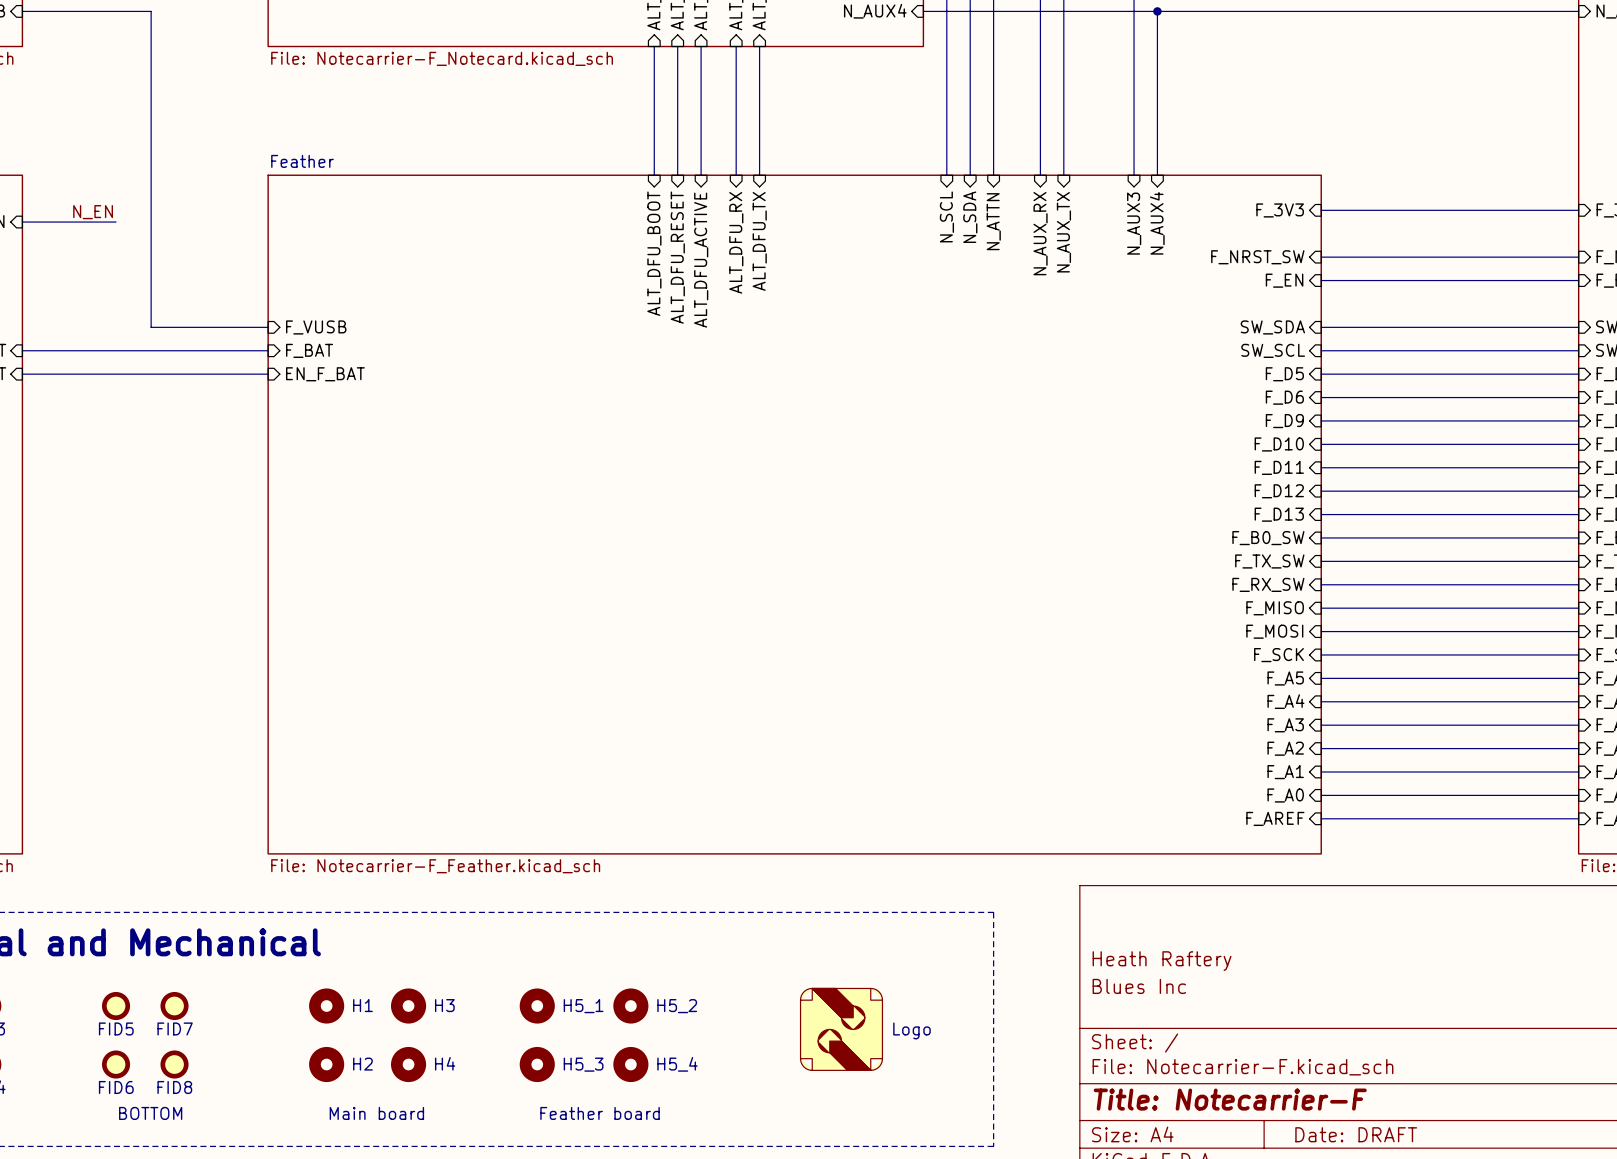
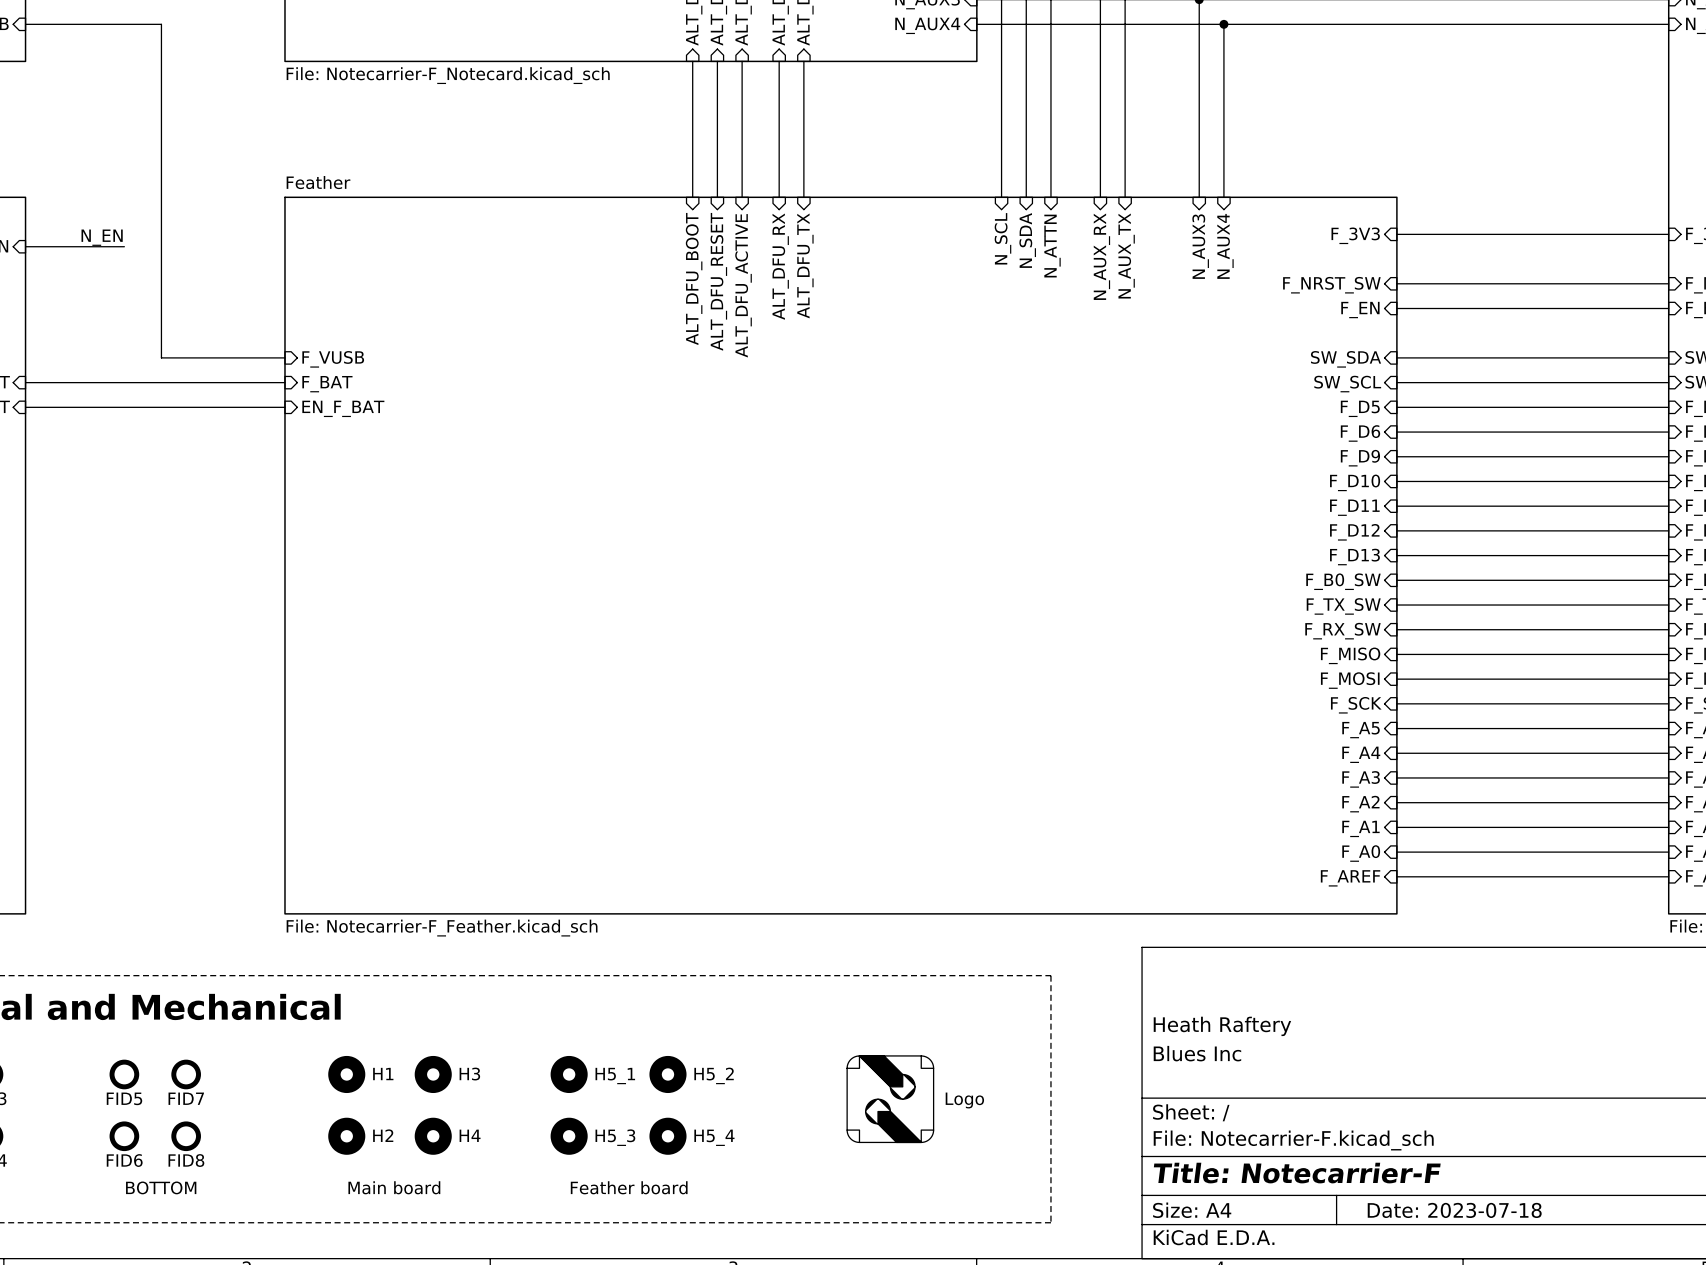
title block: Date: DRAFT (1356, 1134) -> Date: 2023-07-18 (1454, 1210)

